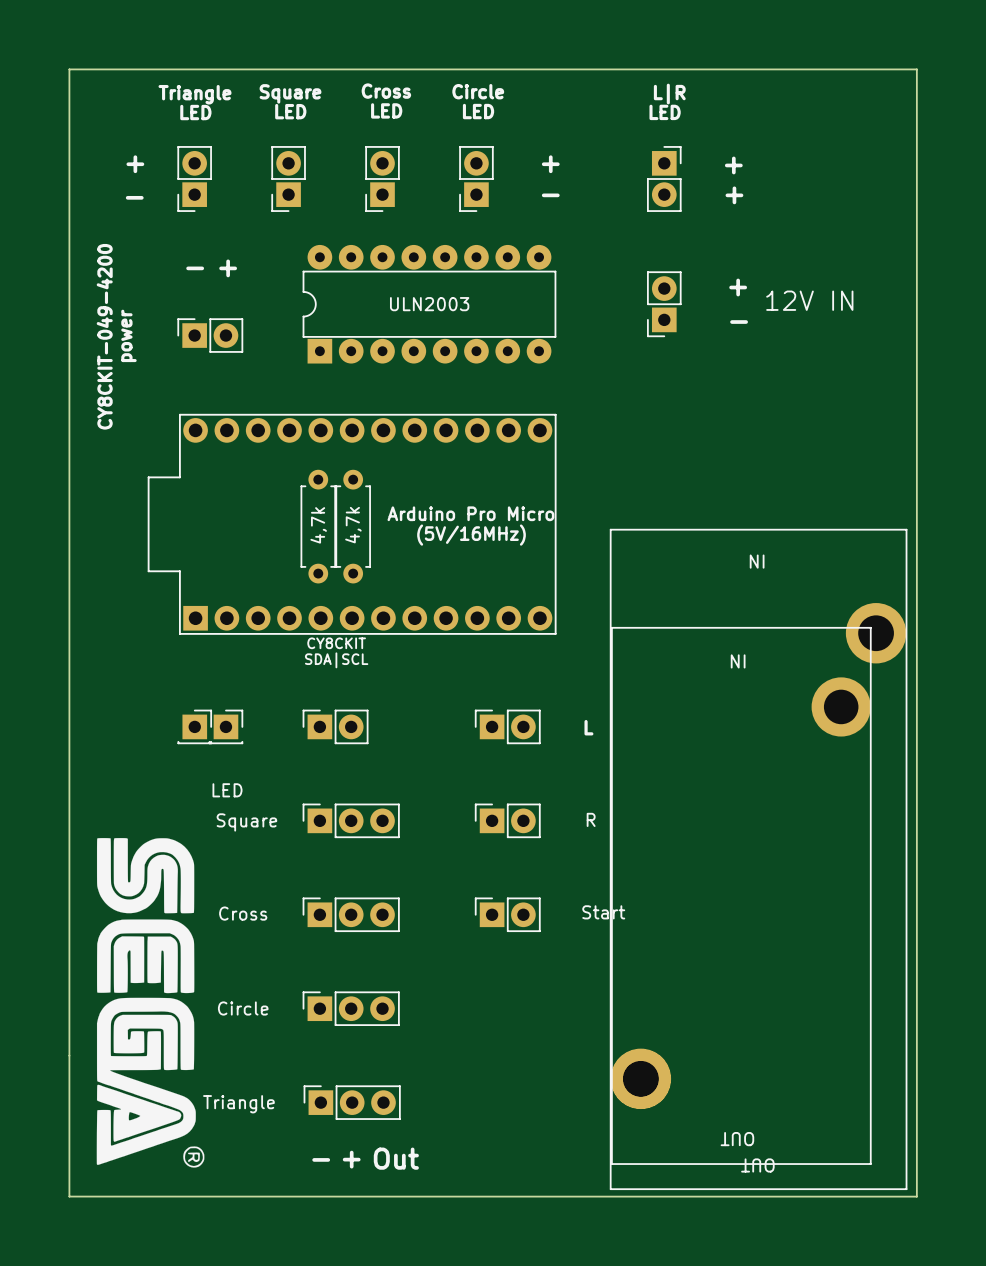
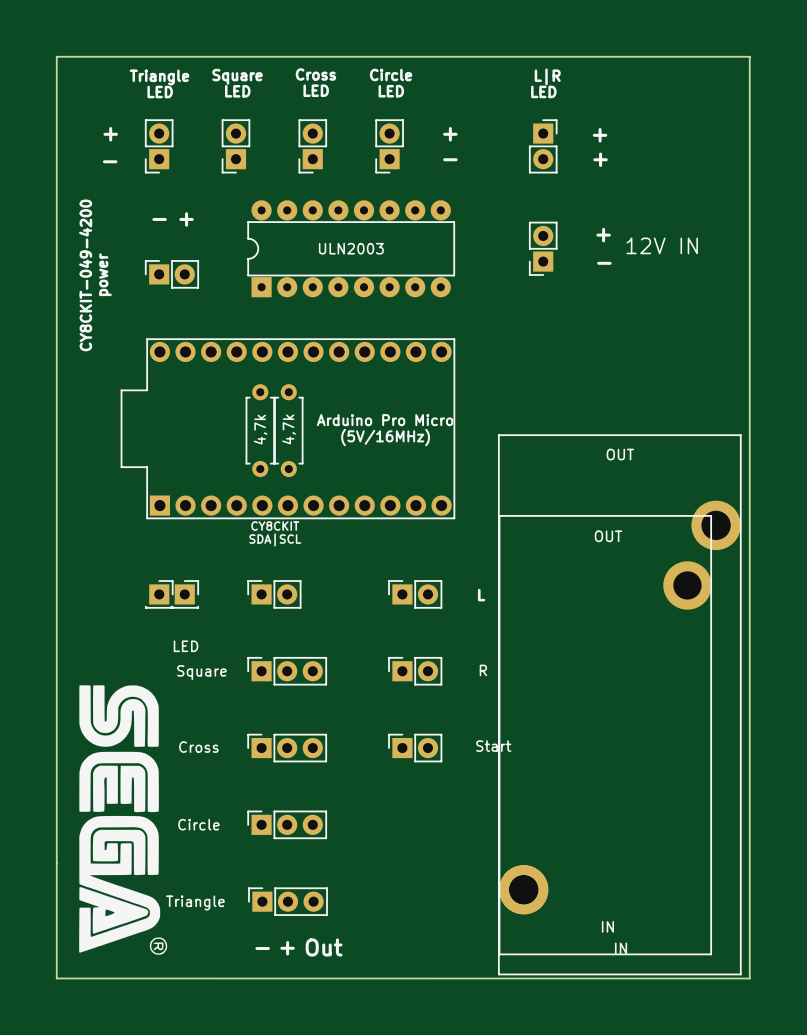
part rotation: 0° (758, 859) -> 180° (619, 704)
part rotation: 0° (741, 895) -> 180° (605, 735)

